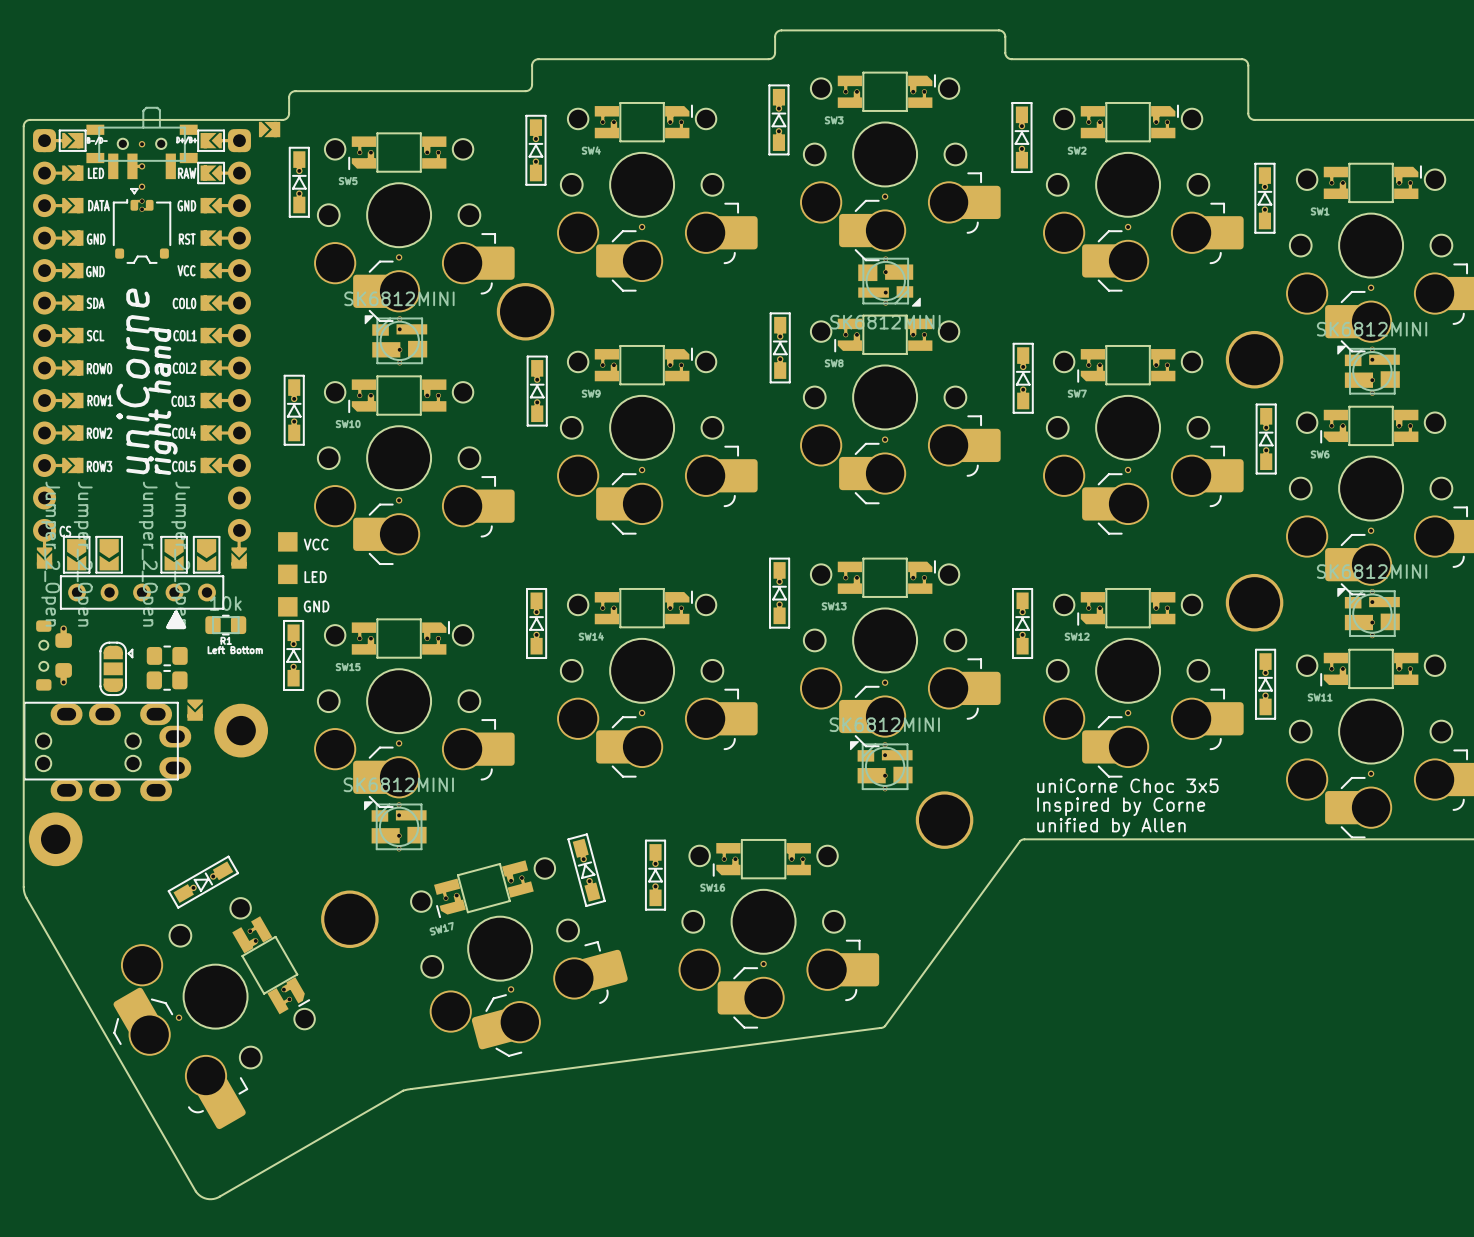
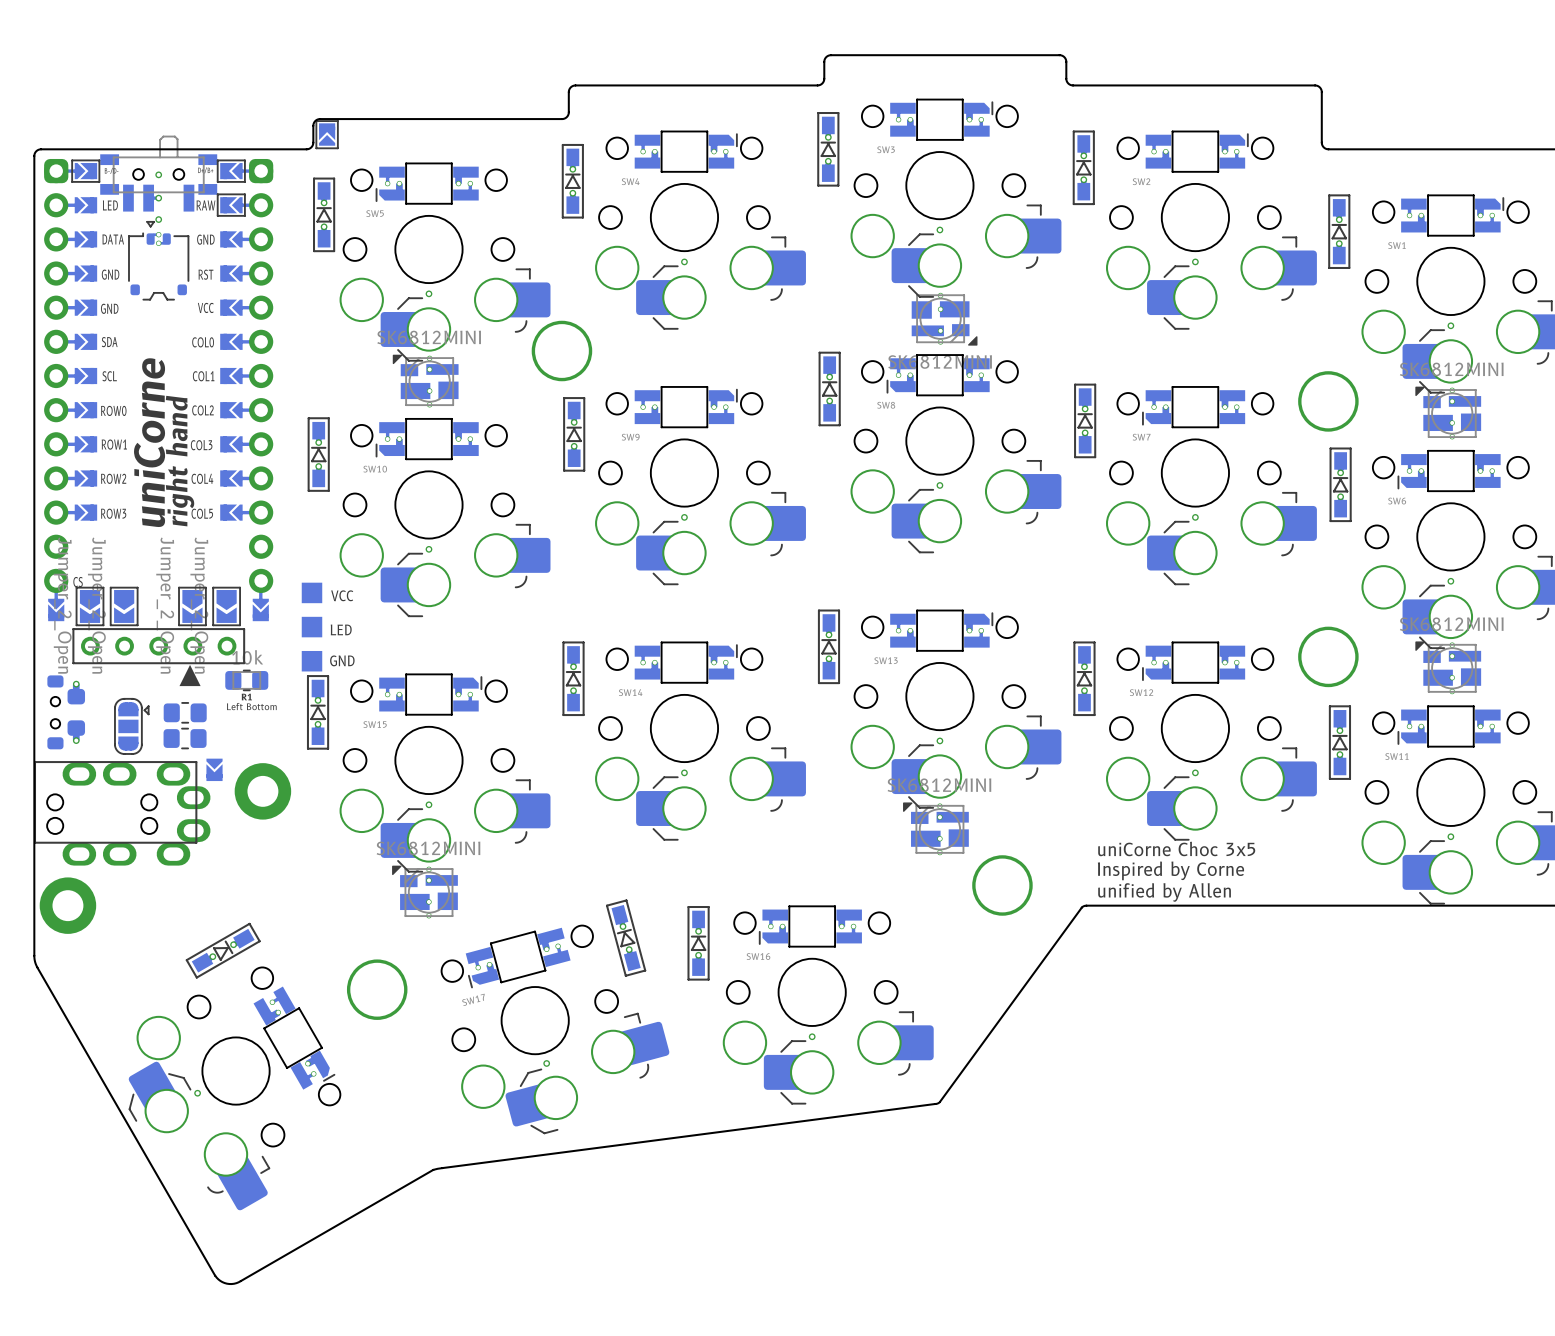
line: none -> (337, 121) (316, 121) (316, 148) (337, 148) (337, 121)
part rotation: 0° (269, 129) -> 90° counterclockwise (327, 134)
part position: (269, 129) -> (327, 134)

